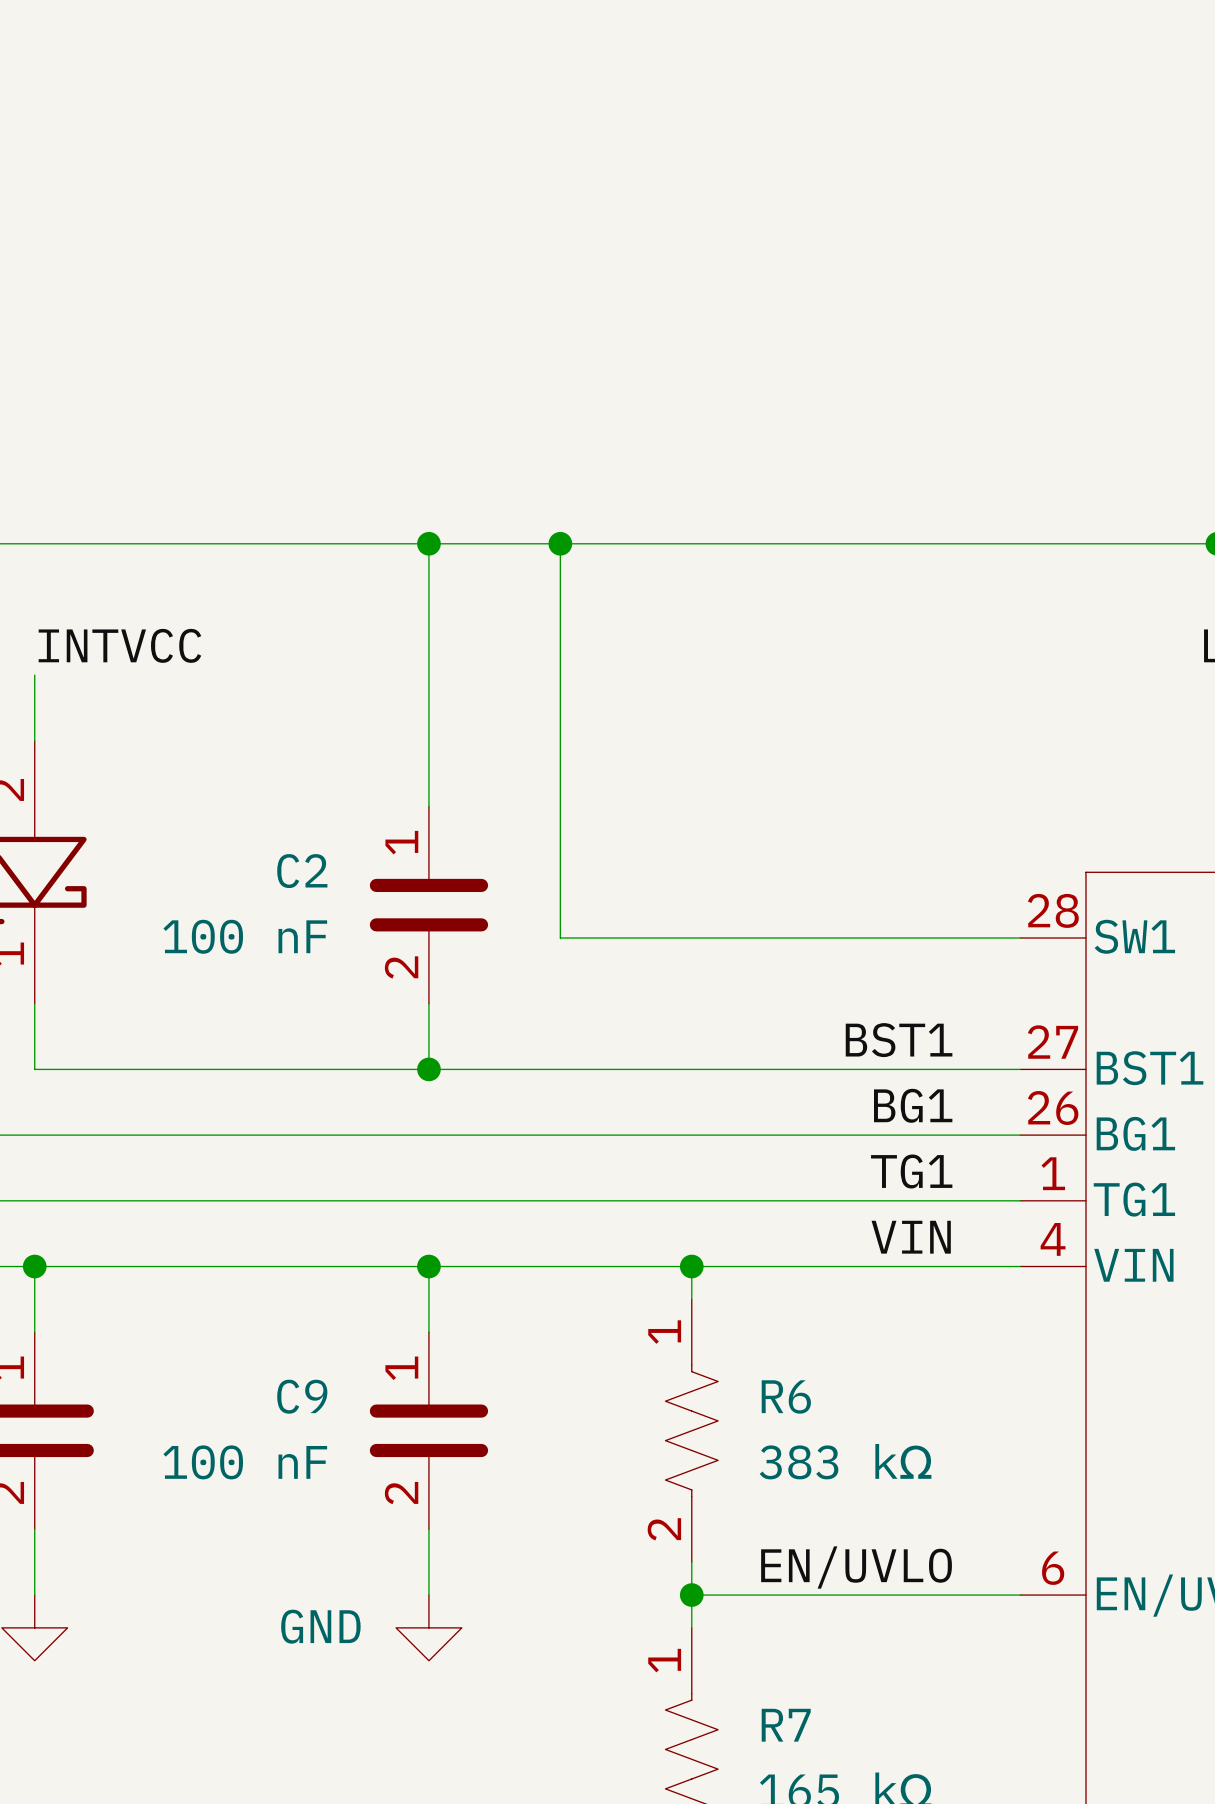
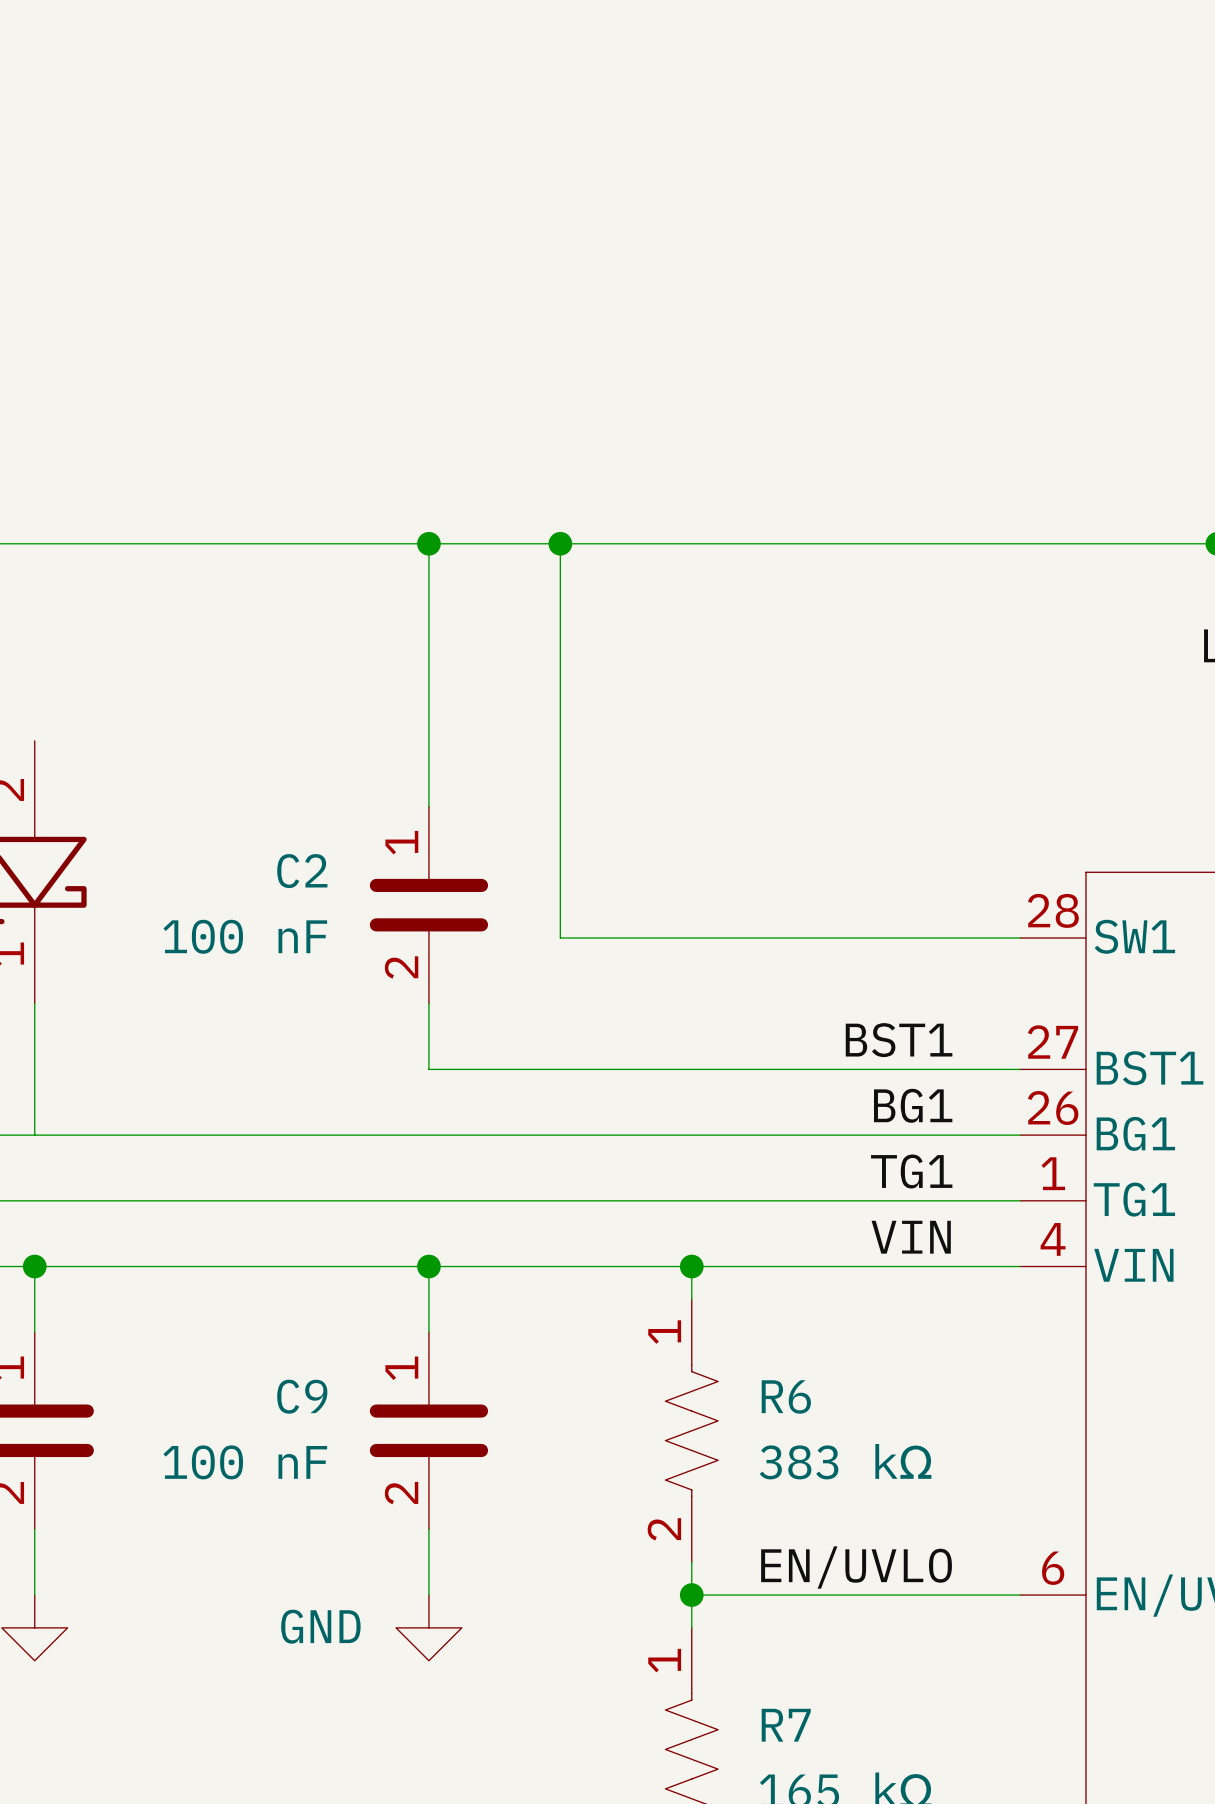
label: INTVCC (119, 645) -> none
wire: (34, 675) (34, 740) -> none
wire: (34, 1069) (428, 1069) -> (34, 1069) (34, 1135)
junction: (428, 1069) -> none

